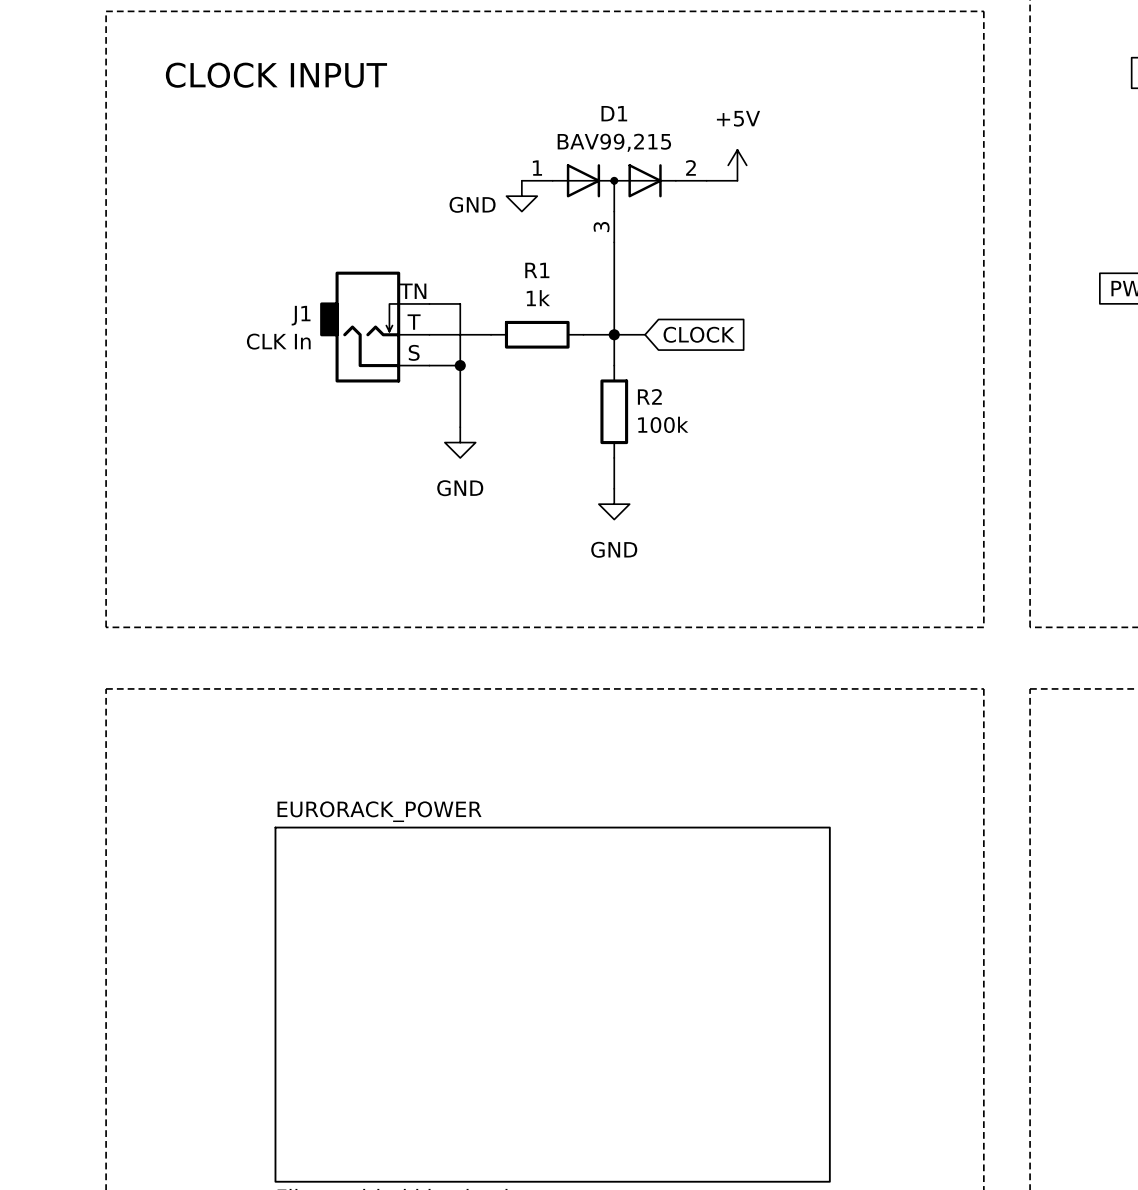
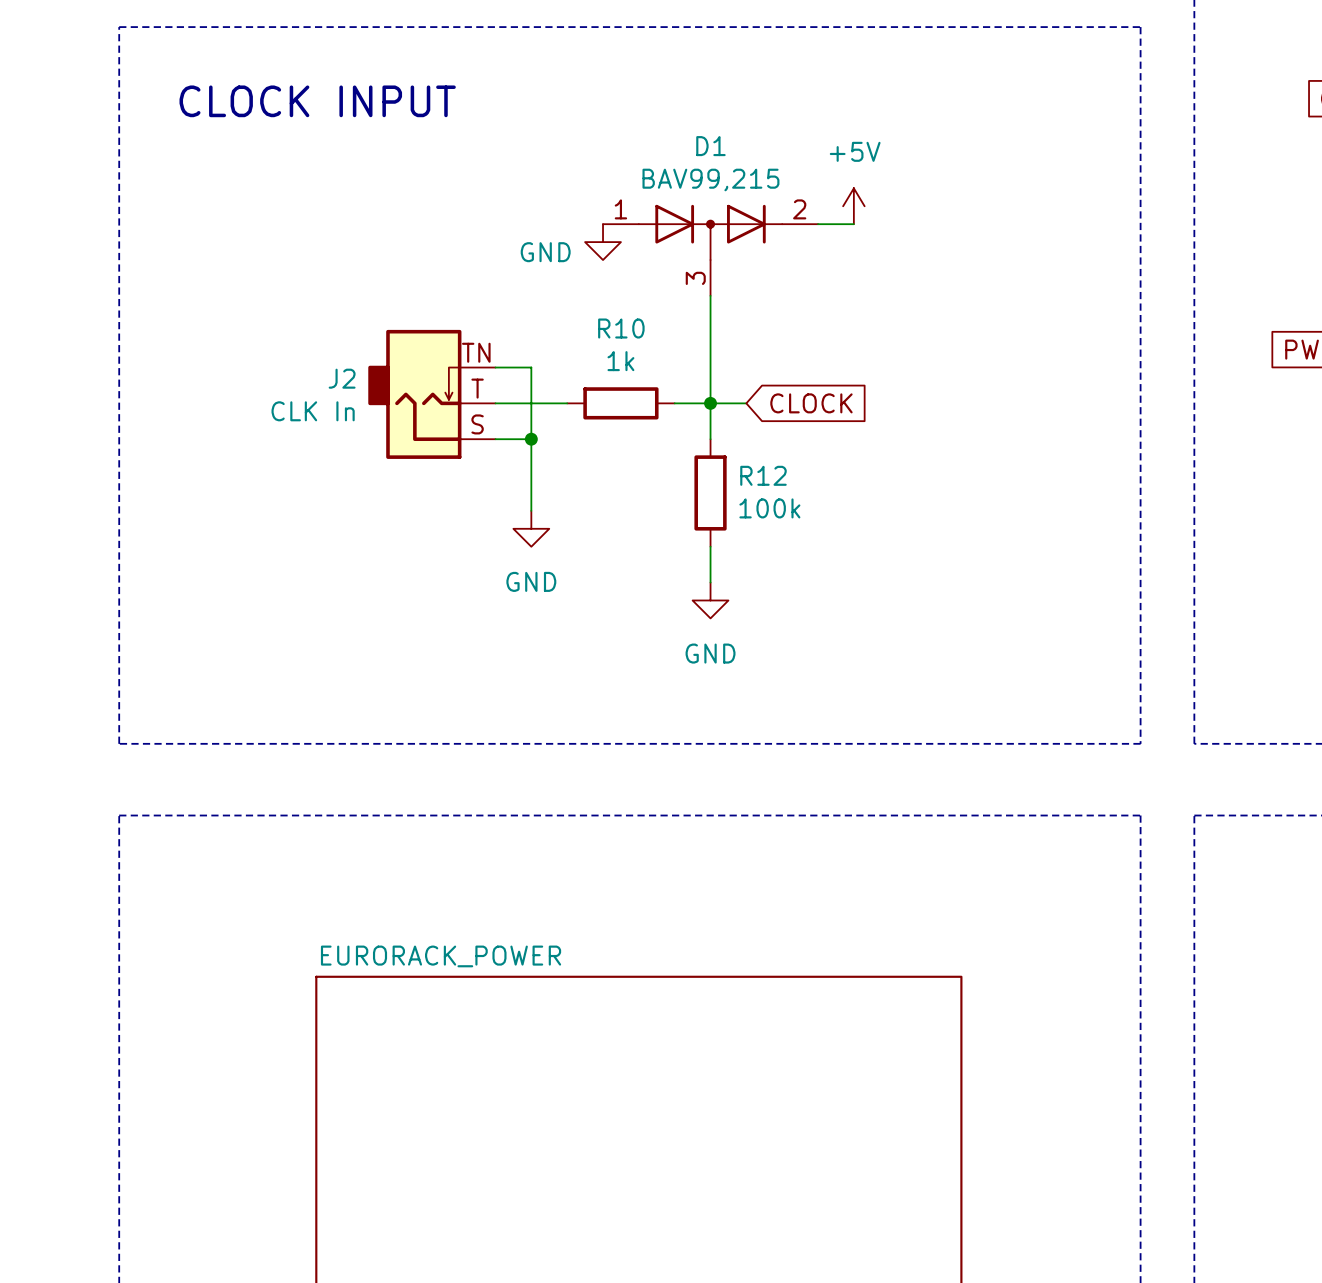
R1 name: R1 (537, 270) -> R10 (621, 328)
J1 name: J1 (301, 315) -> J2 (342, 378)
R2 name: R2 (649, 396) -> R12 (763, 475)

